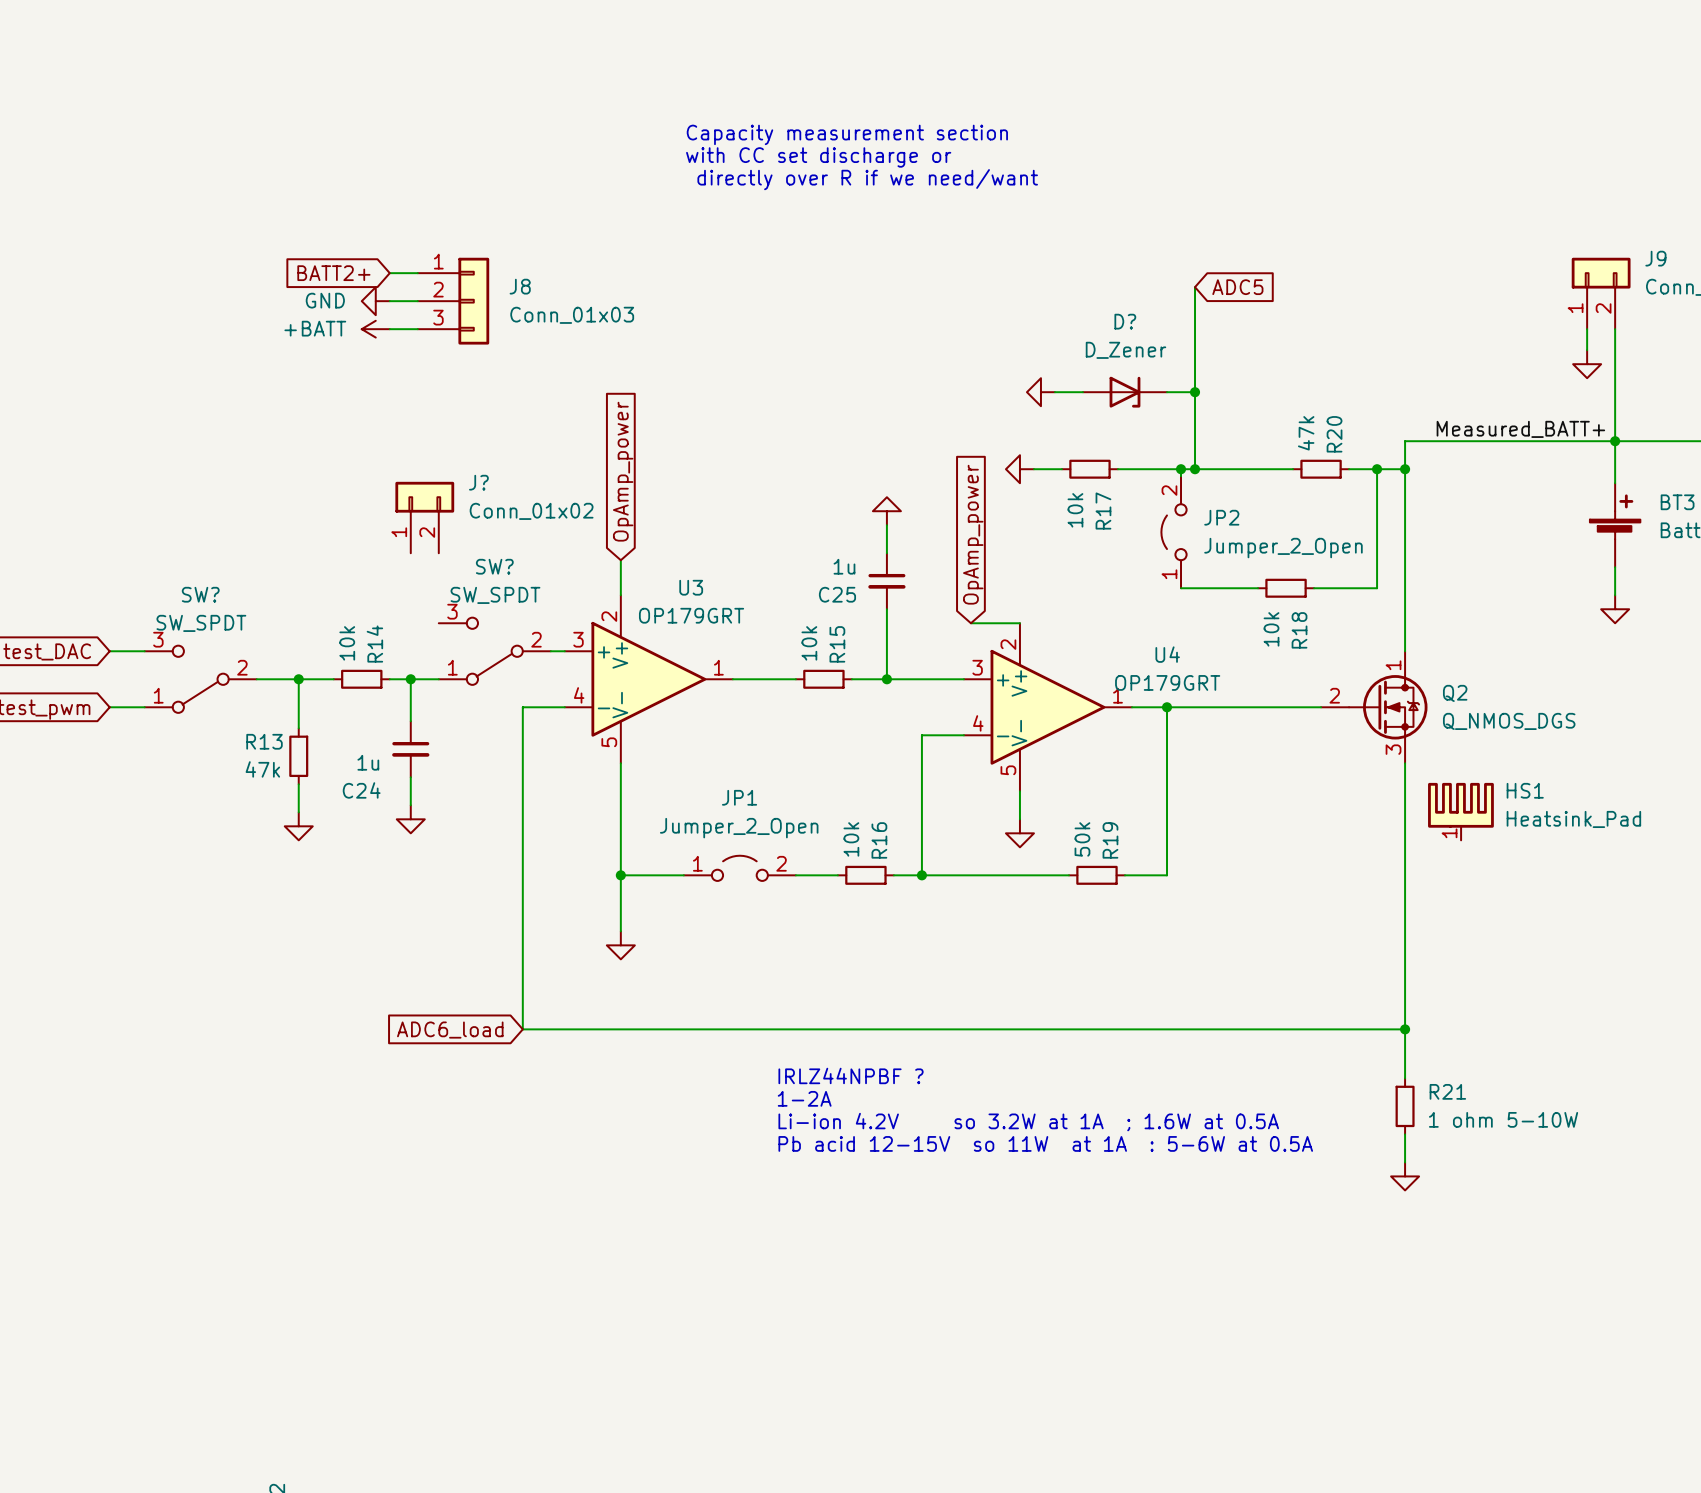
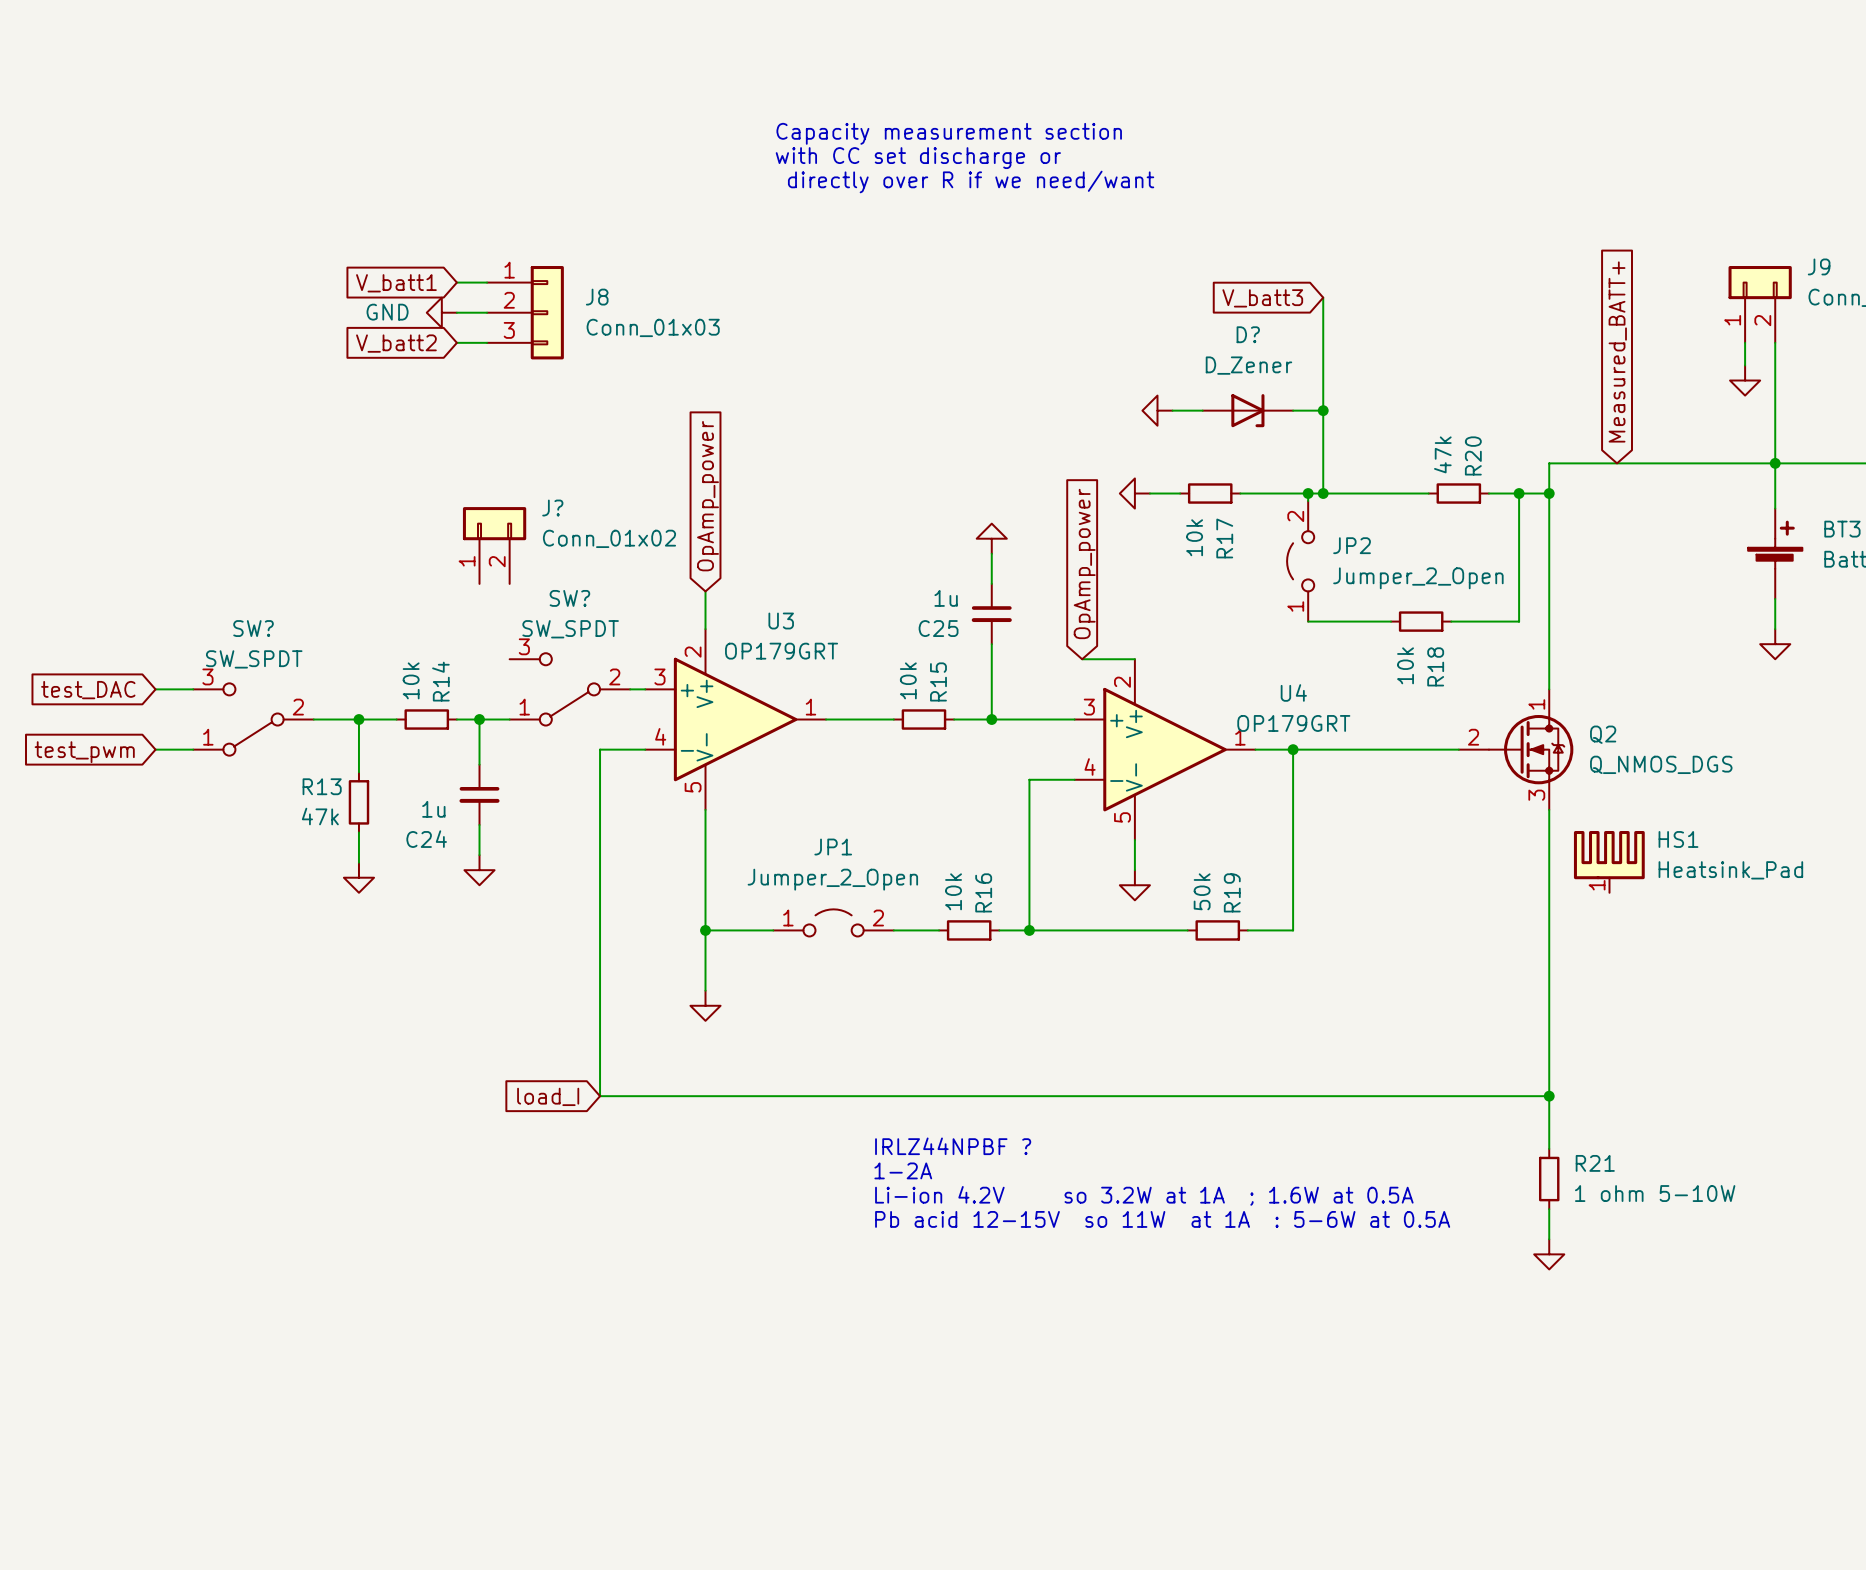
global label: BATT2+ (333, 273) -> V_batt1 (396, 283)
global label: ADC5 (1237, 287) -> V_batt3 (1262, 298)
global label: none -> V_batt2 (396, 343)
power symbol: +BATT (375, 329) -> none
global label: none -> Measured_BATT+ (1617, 351)
label: Measured_BATT+ (1520, 429) -> none
global label: ADC6_load (450, 1030) -> load_I (548, 1096)

